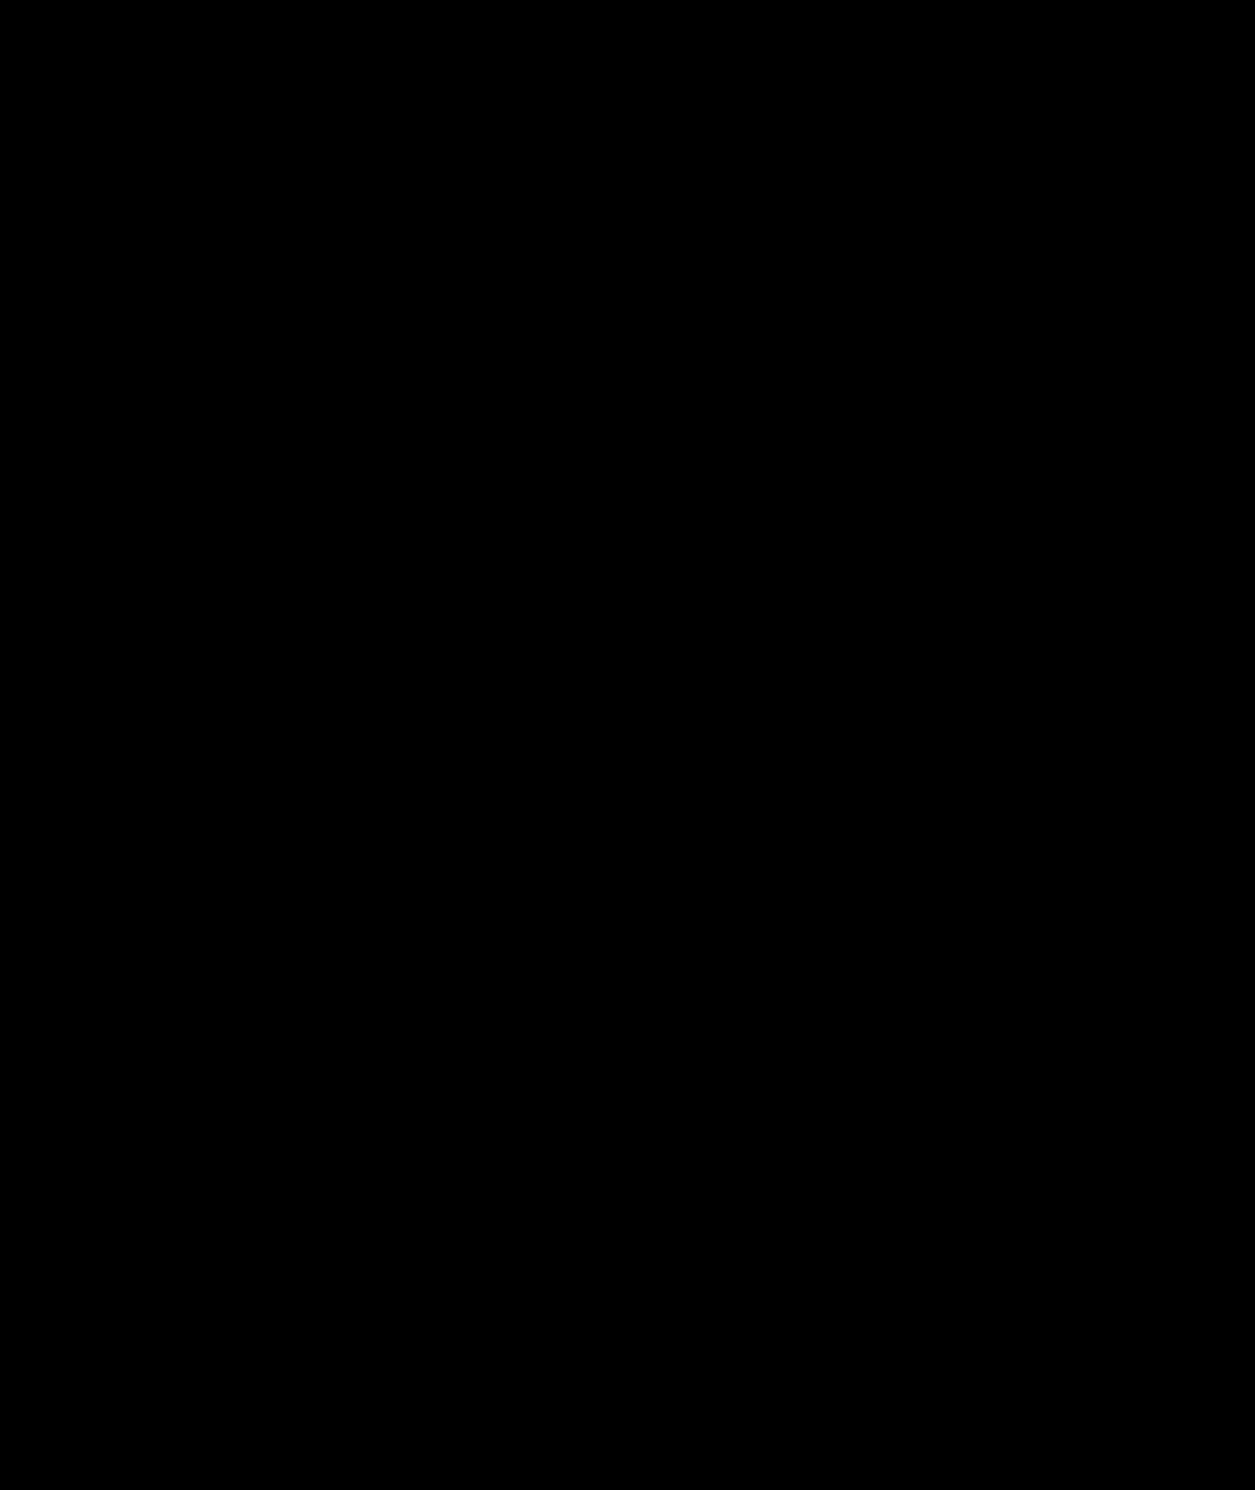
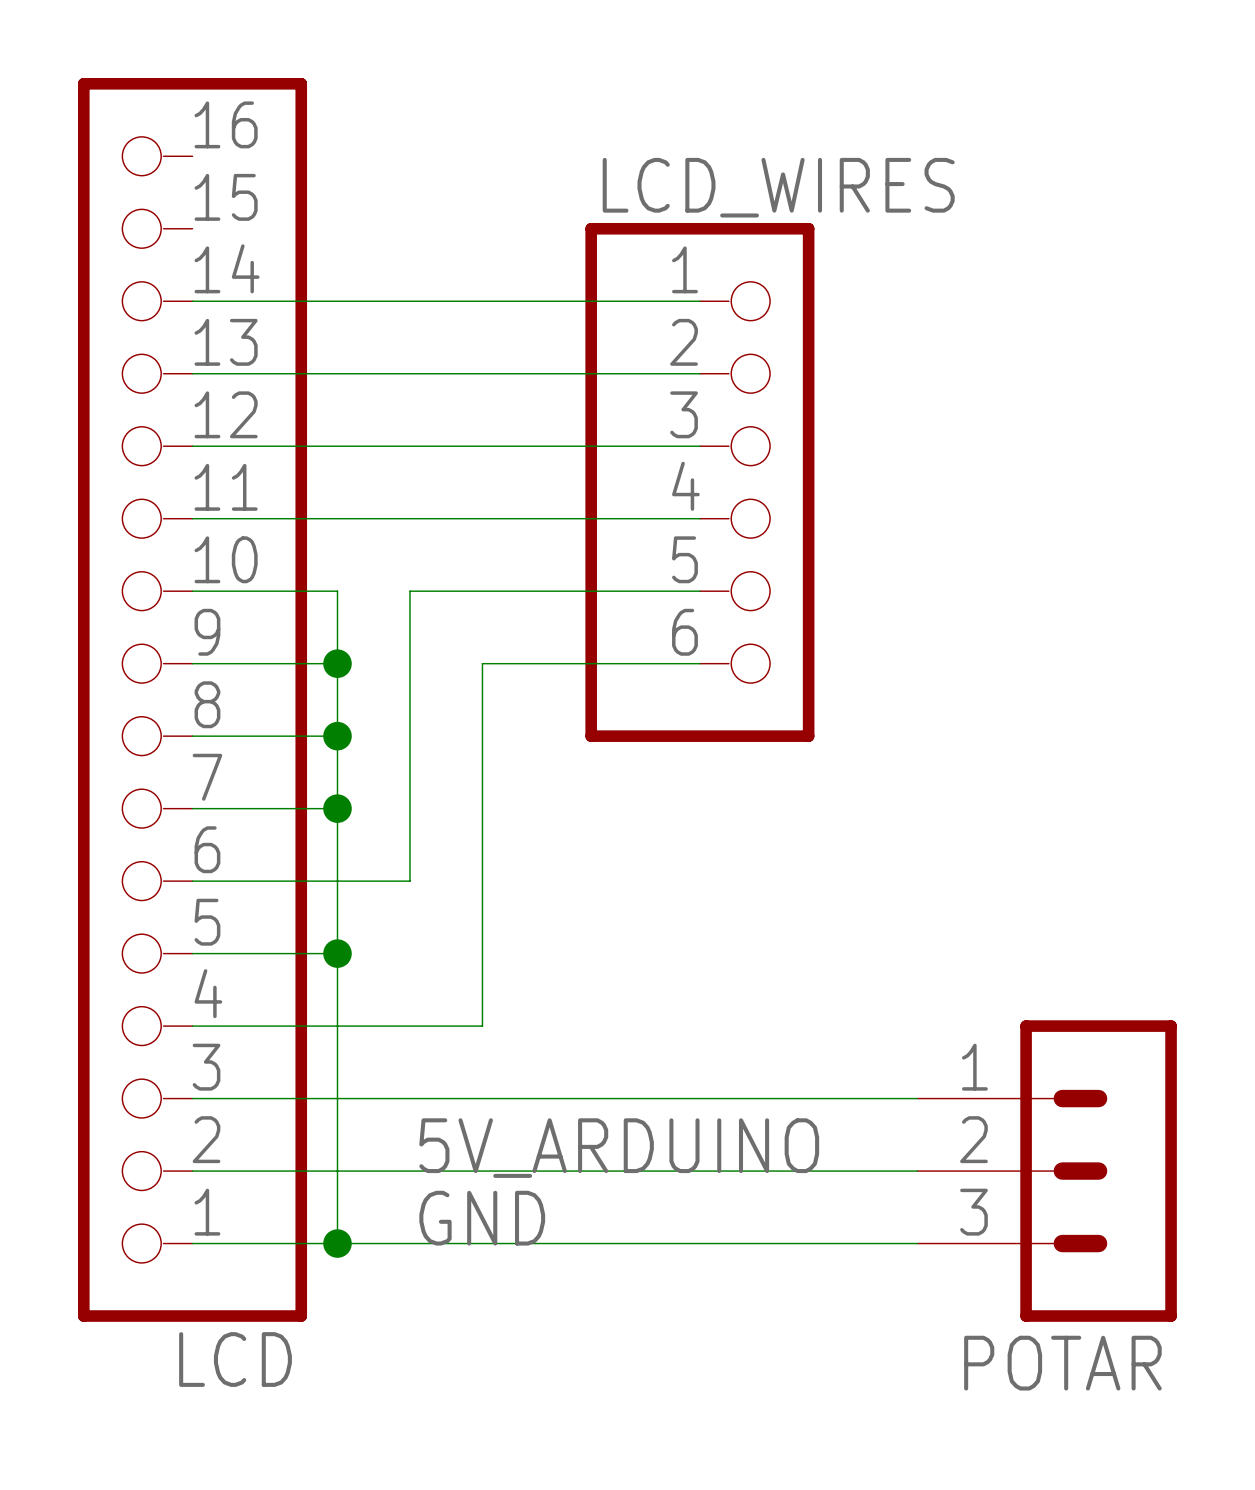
wire: none -> (192, 301) (699, 301)
wire: none -> (192, 373) (699, 373)
wire: none -> (192, 446) (699, 446)
LCD_WIRES: none -> (699, 482)
wire: none -> (192, 518) (699, 518)
wire: none -> (192, 591) (337, 591) (337, 1243)
wire: none -> (699, 591) (409, 591) (409, 881) (192, 881)
wire: none -> (192, 663) (337, 663)
junction: none -> (337, 663)
wire: none -> (699, 663) (482, 663) (482, 1026) (192, 1026)
LCD: none -> (192, 699)
wire: none -> (192, 736) (337, 736)
junction: none -> (337, 736)
wire: none -> (192, 808) (337, 808)
junction: none -> (337, 808)
wire: none -> (192, 953) (337, 953)
junction: none -> (337, 953)
wire: none -> (192, 1098) (917, 1098)
label: none -> 5V_ARDUINO (619, 1148)
wire: none -> (192, 1171) (917, 1171)
POTAR: none -> (1047, 1171)
label: none -> GND (482, 1218)
wire: none -> (192, 1243) (917, 1243)
junction: none -> (337, 1243)

